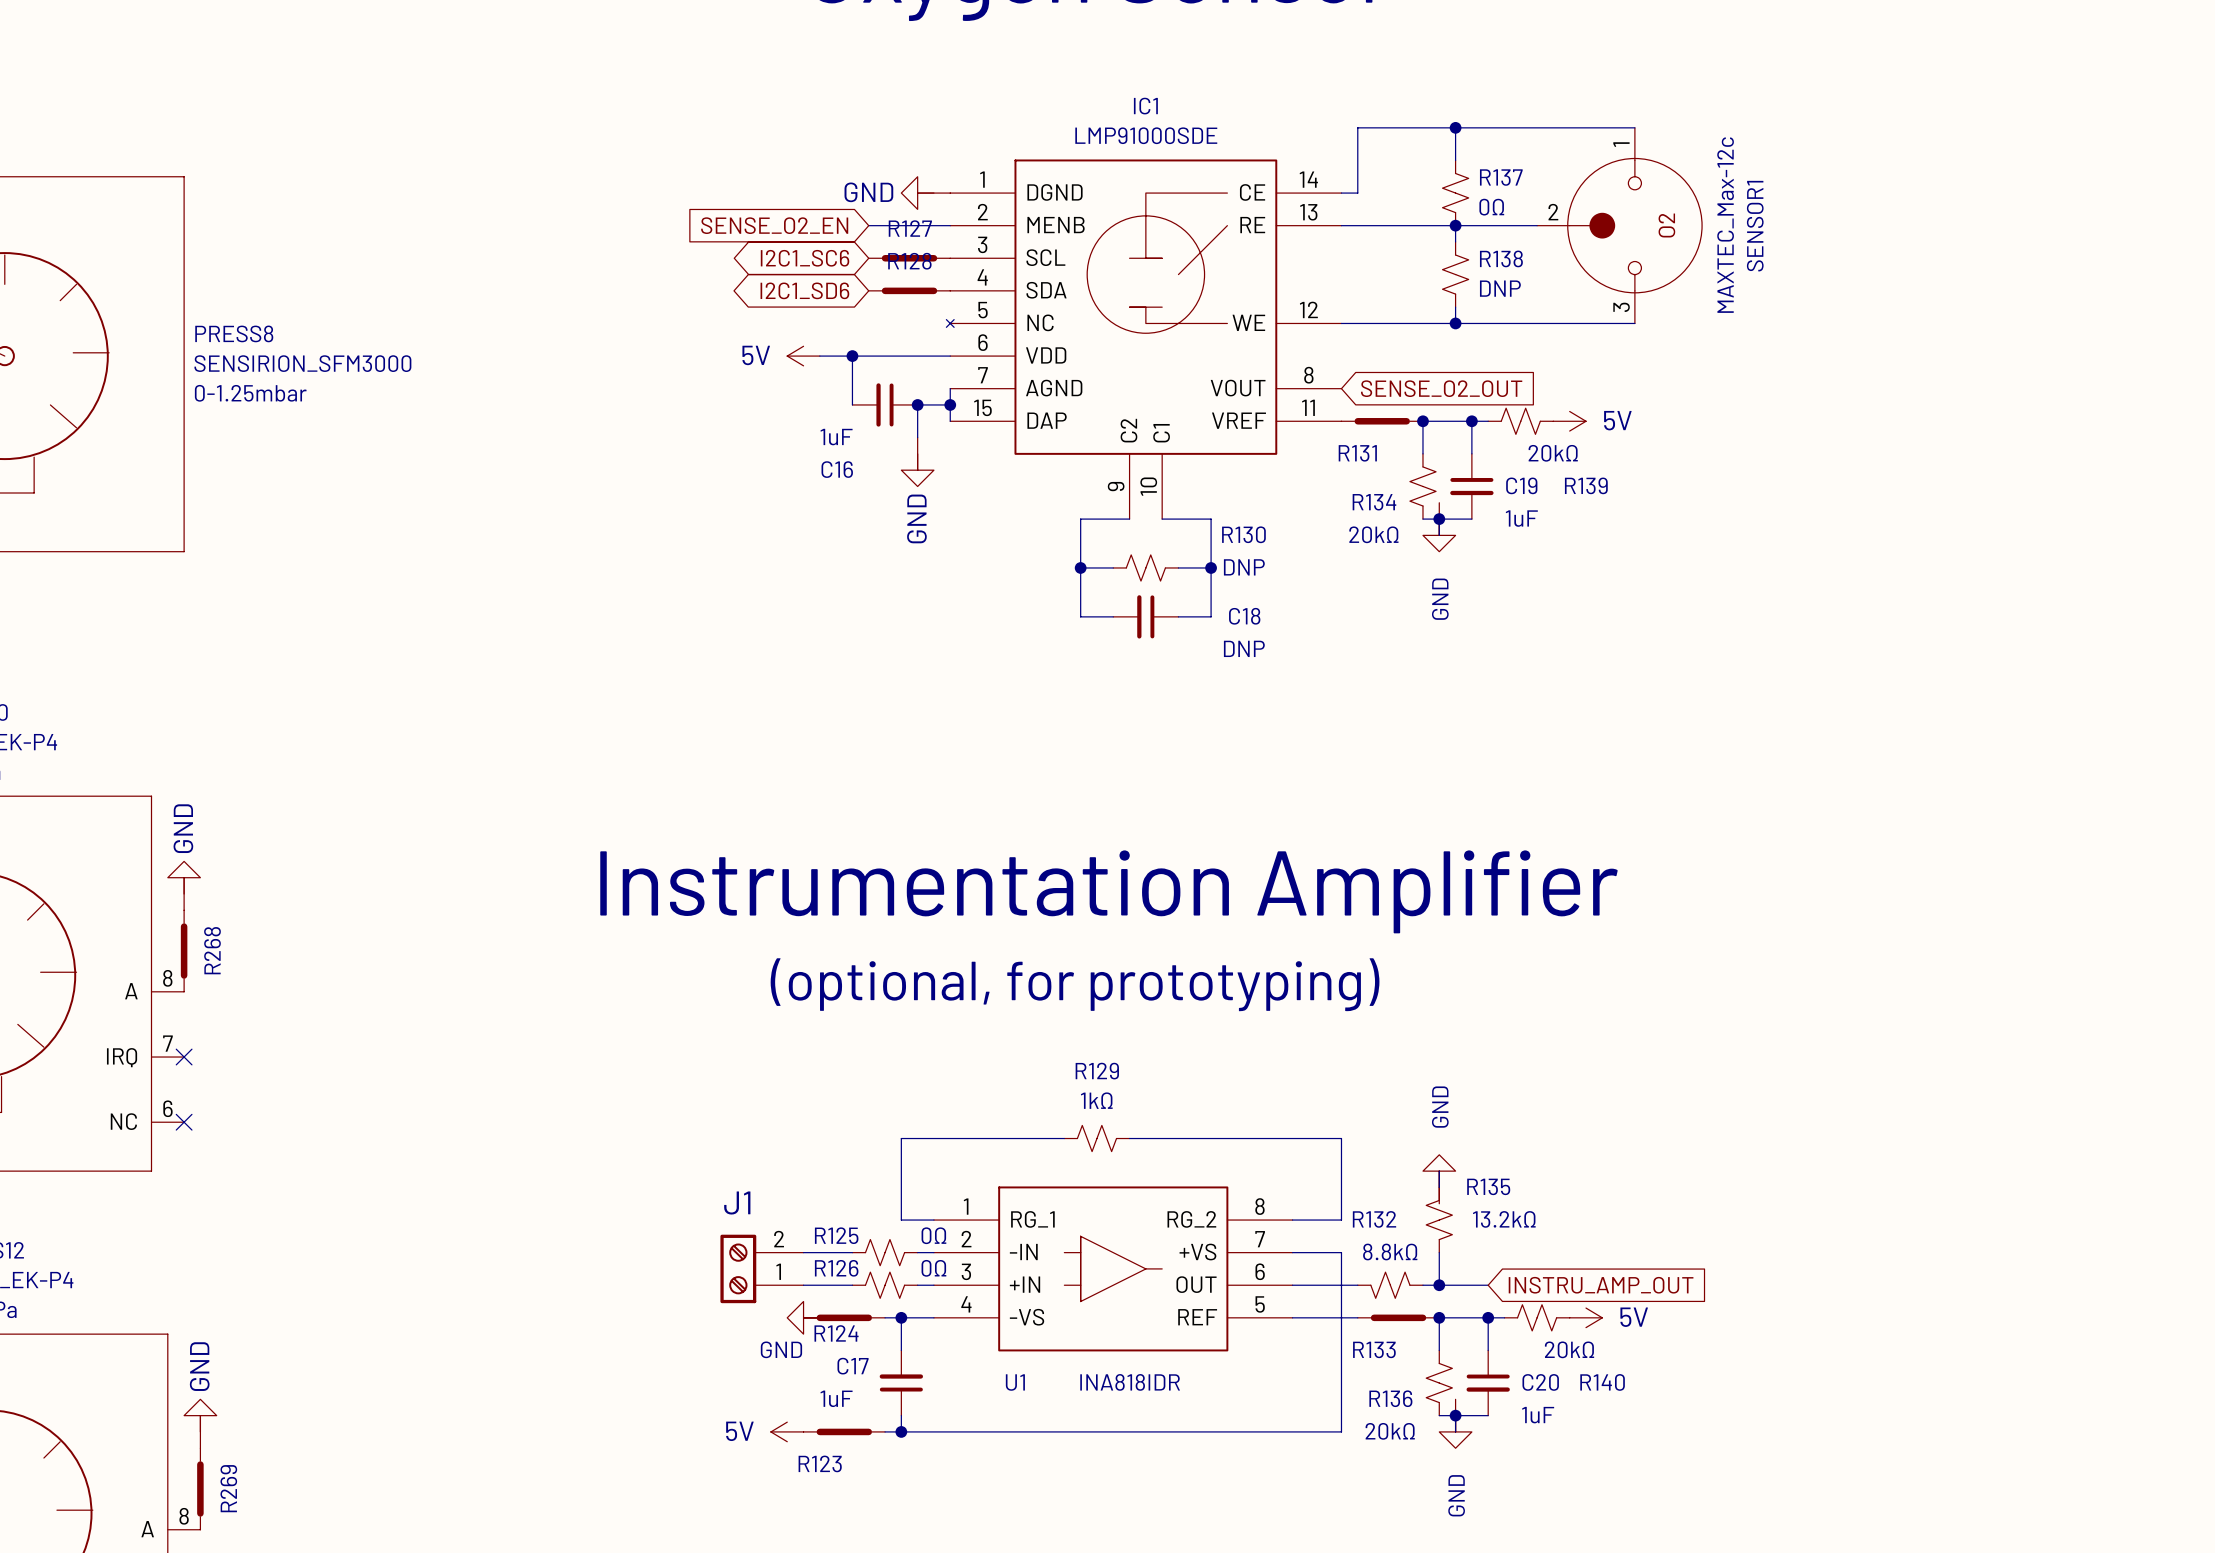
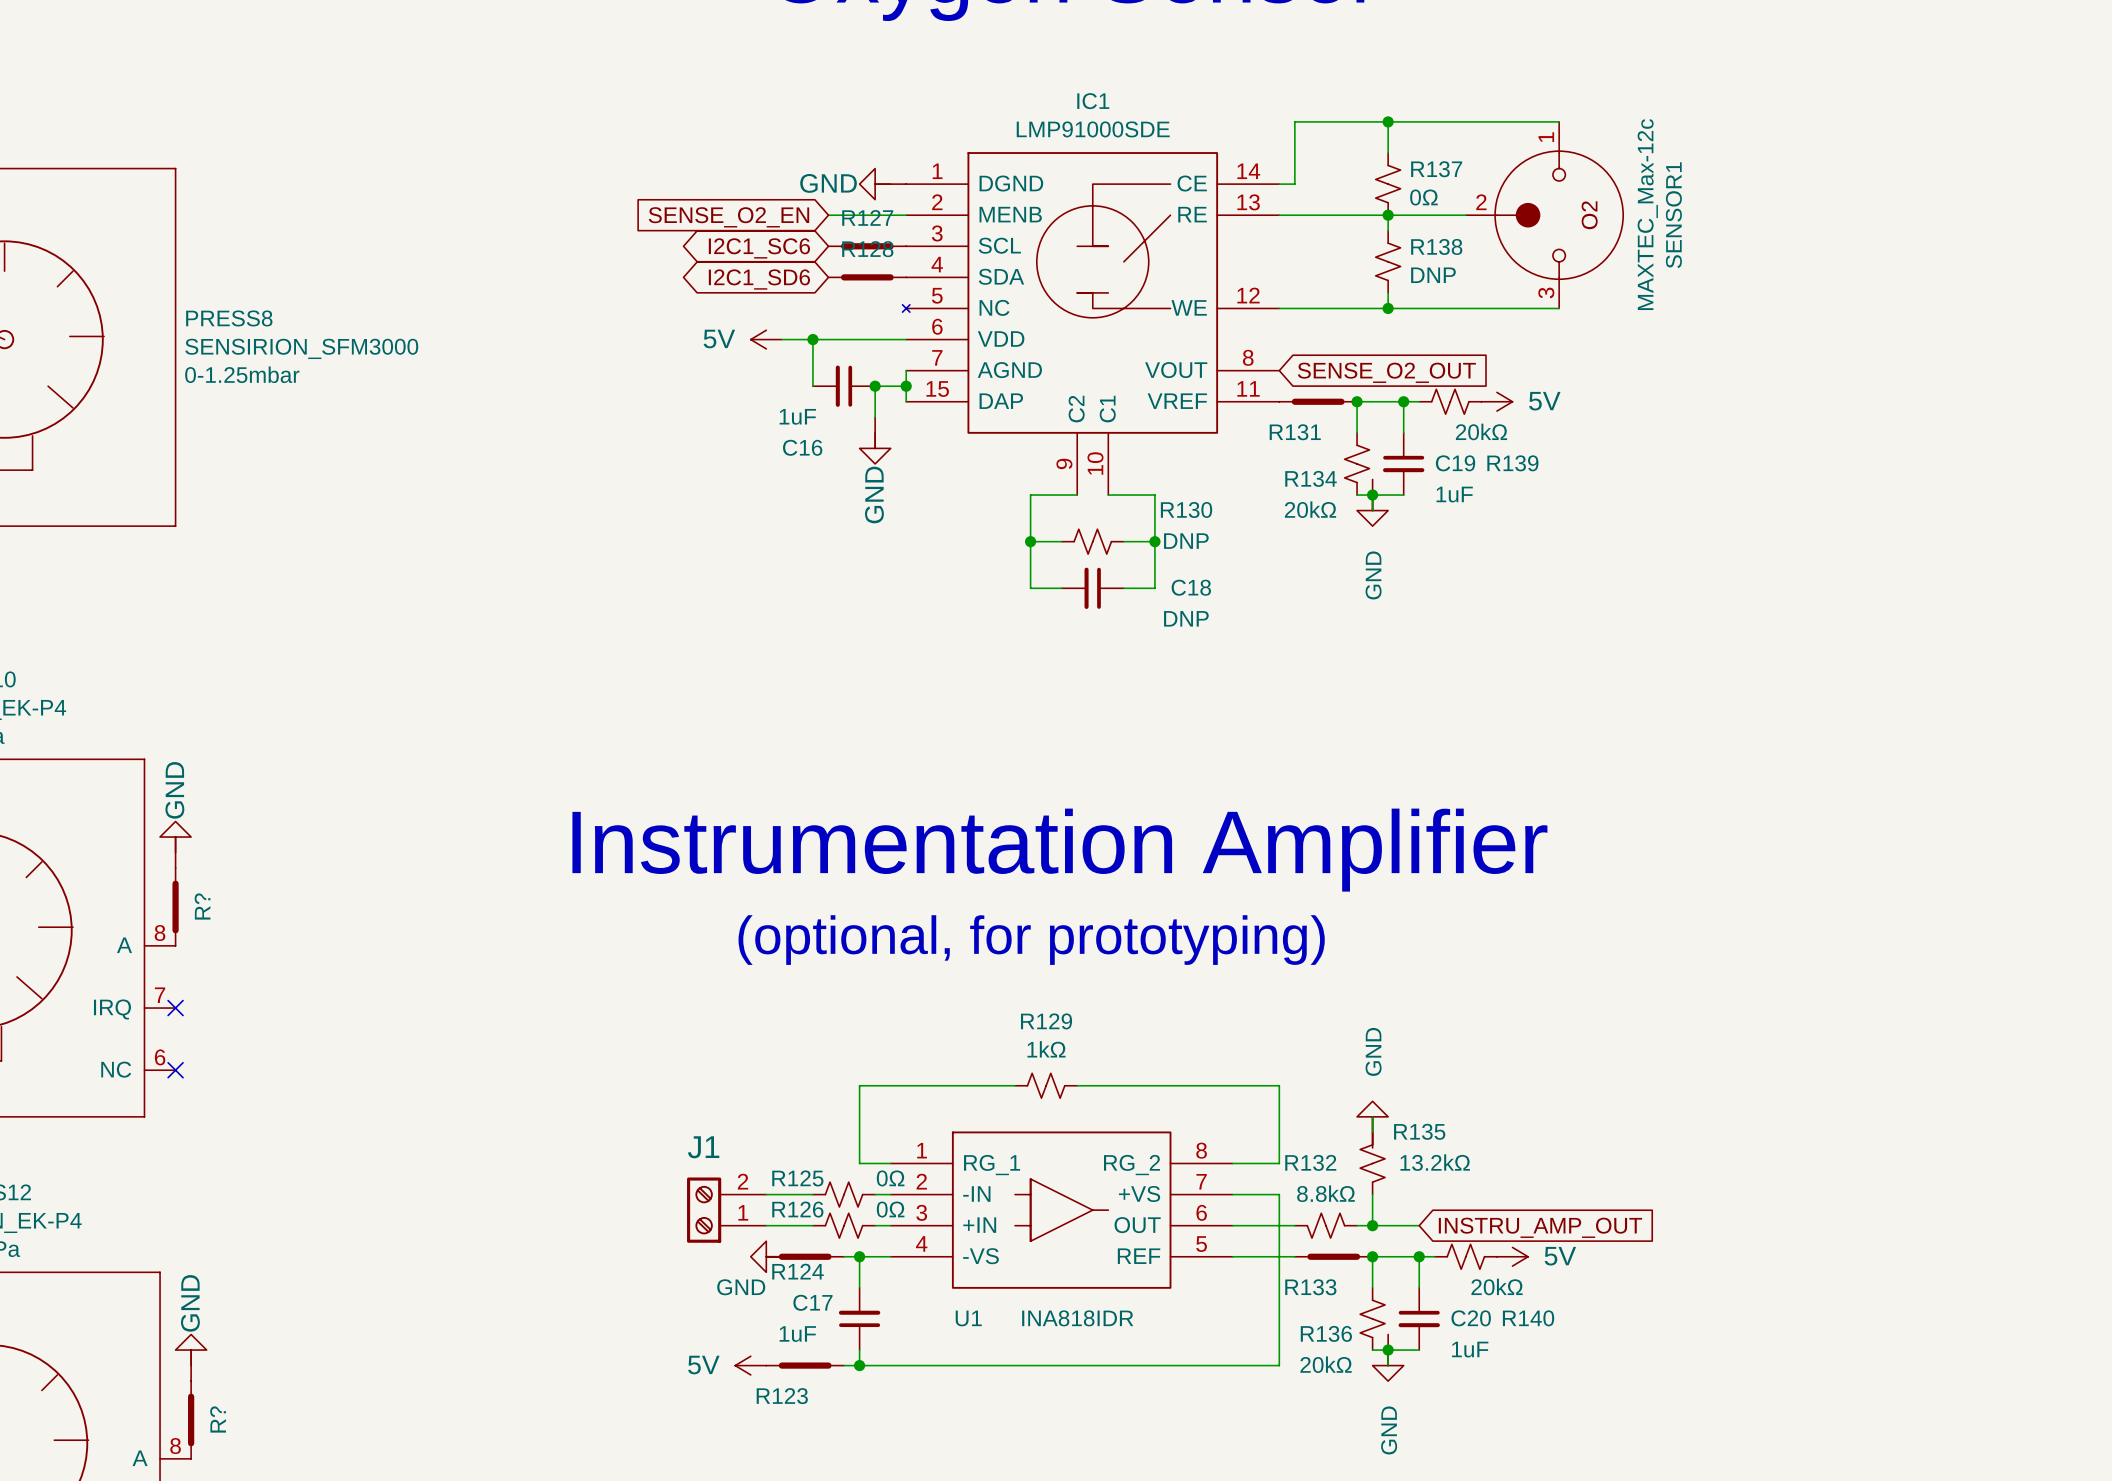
R268 name: R268 (212, 950) -> R? (202, 906)
R269 name: R269 (228, 1488) -> R? (218, 1419)

